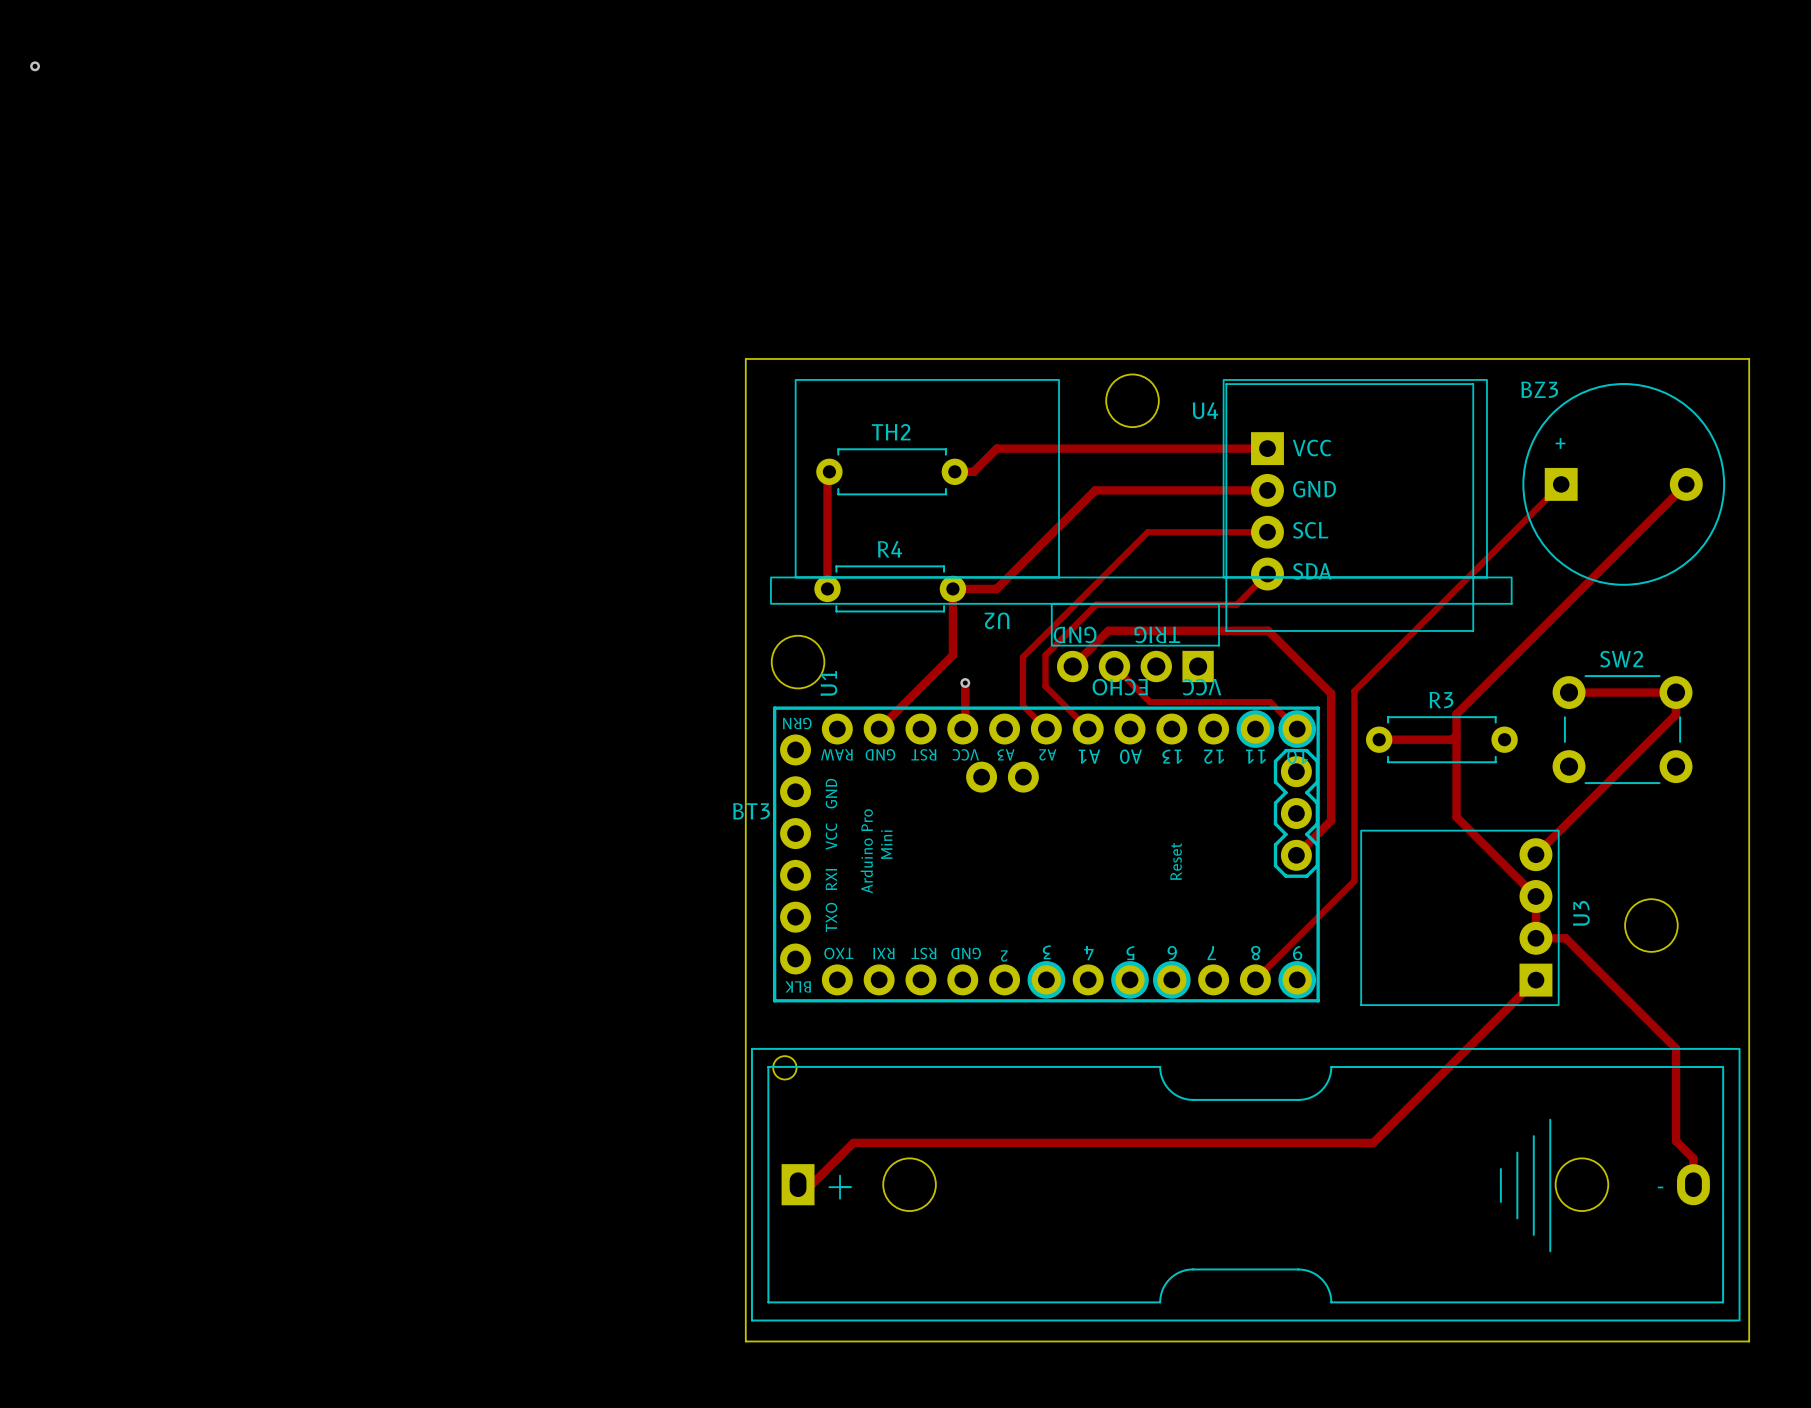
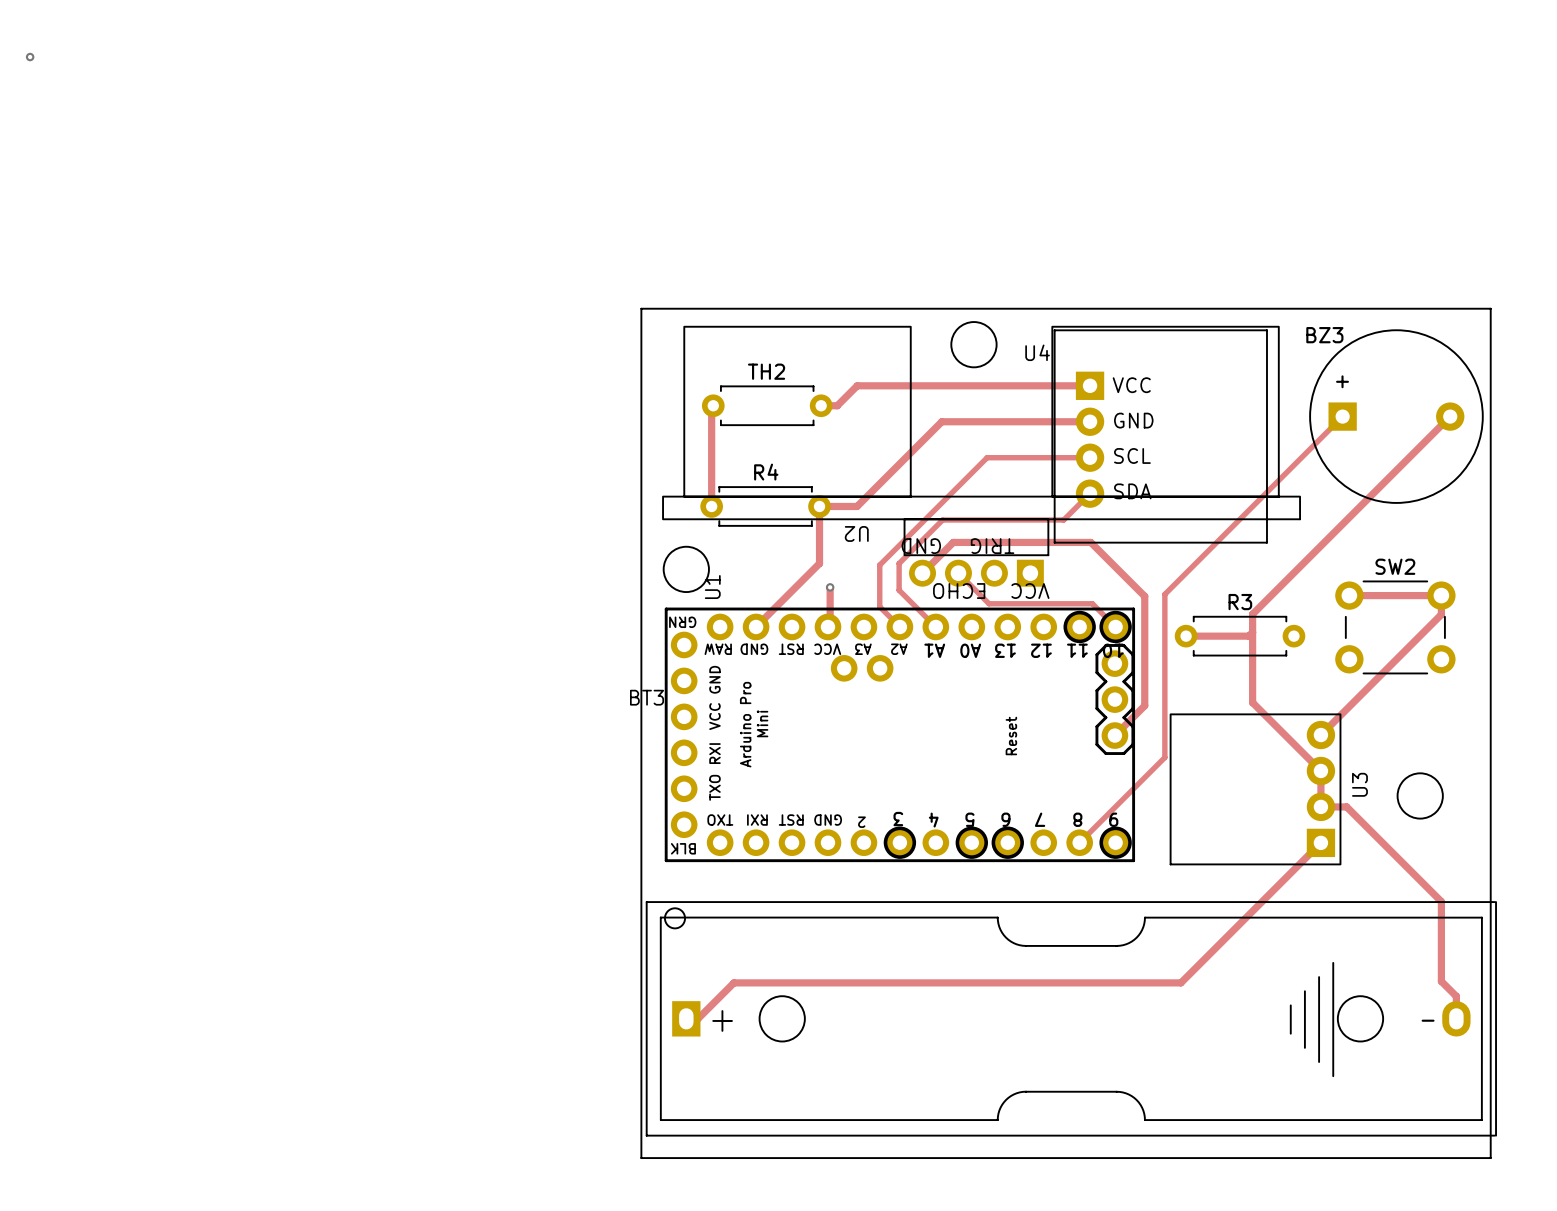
board edge: (1733, 358) (1749, 358) (1749, 1341) (745, 1341) -> (1490, 308) (1490, 1158) (641, 1158) (641, 1153)

